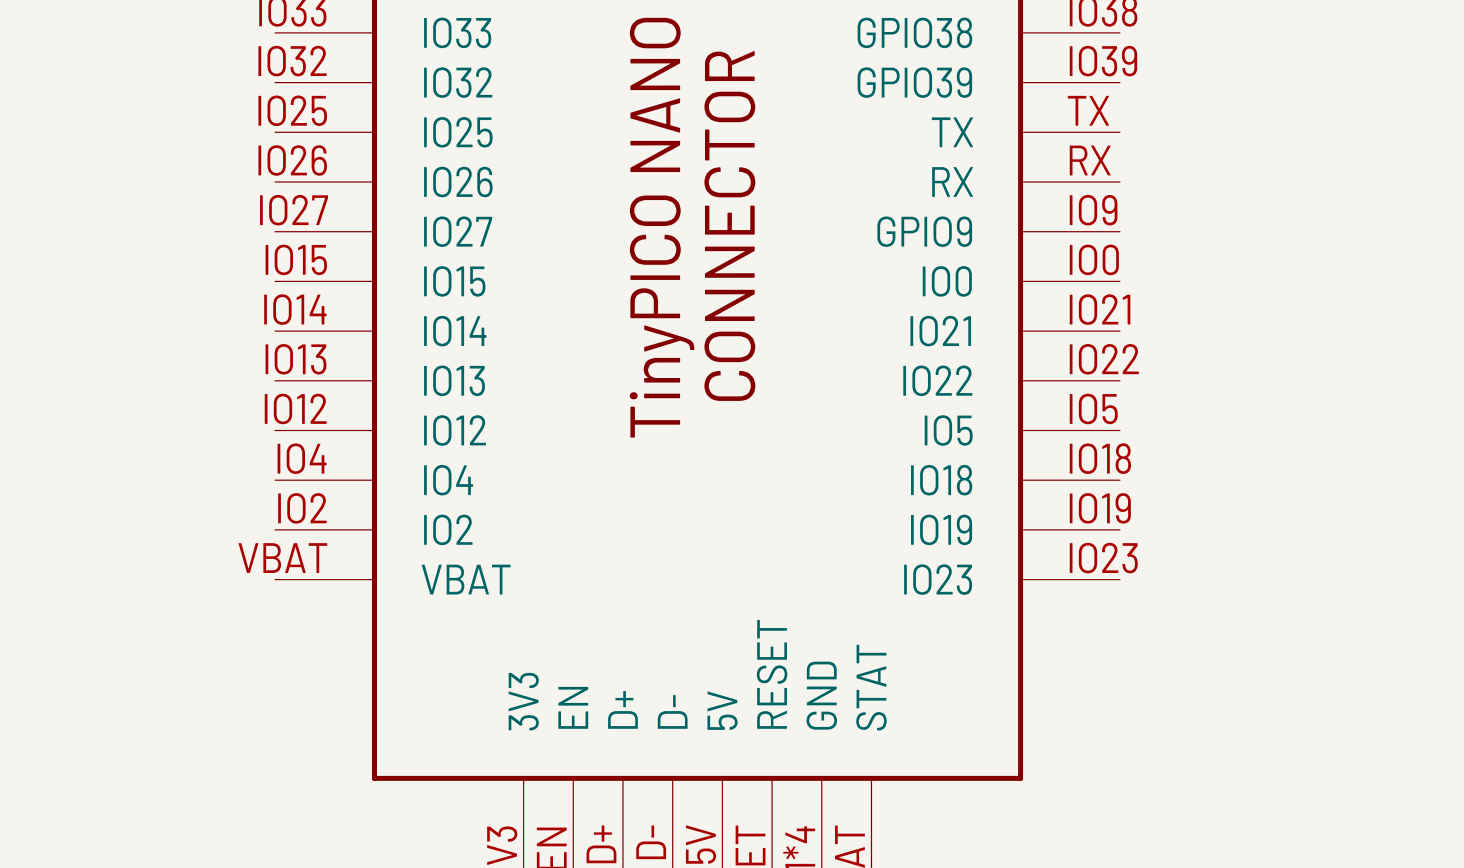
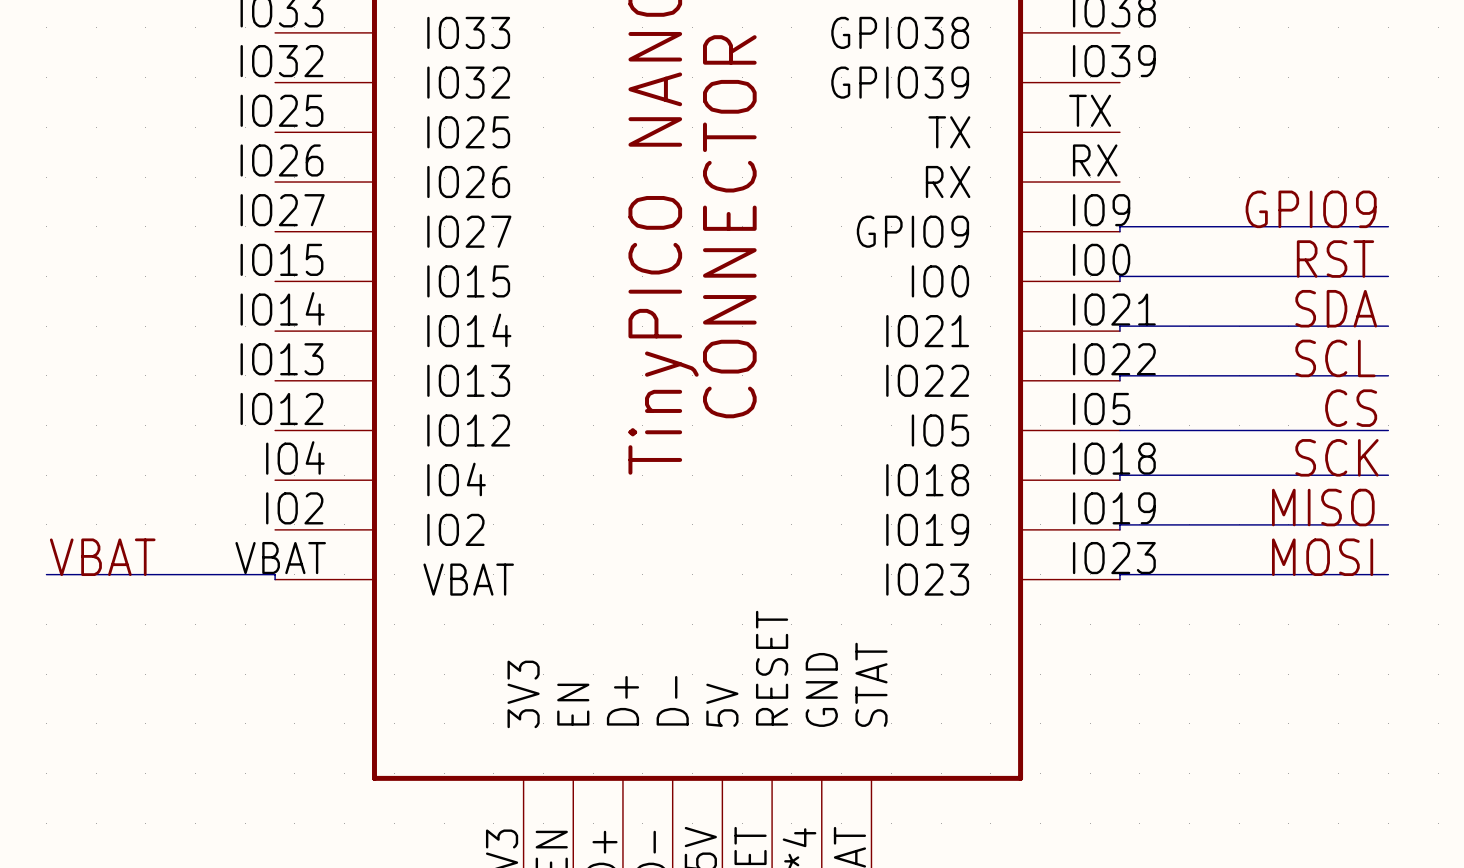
label: none -> GPIO9 (1311, 209)
wire: none -> (1388, 226) (1119, 226) (1119, 231)
label: none -> RST (1335, 259)
wire: none -> (1388, 276) (1119, 276) (1119, 281)
label: none -> SDA (1336, 308)
wire: none -> (1388, 326) (1119, 326) (1119, 331)
label: none -> SCL (1335, 358)
wire: none -> (1388, 375) (1119, 375) (1119, 380)
label: none -> CS (1351, 408)
wire: none -> (1119, 430) (1388, 430)
label: none -> SCK (1336, 457)
wire: none -> (1388, 475) (1119, 475) (1119, 480)
label: none -> MISO (1323, 507)
wire: none -> (1388, 524) (1119, 524) (1119, 529)
label: none -> VBAT (102, 557)
label: none -> MOSI (1322, 557)
wire: none -> (46, 574) (275, 574) (275, 579)
wire: none -> (1388, 574) (1119, 574) (1119, 579)

